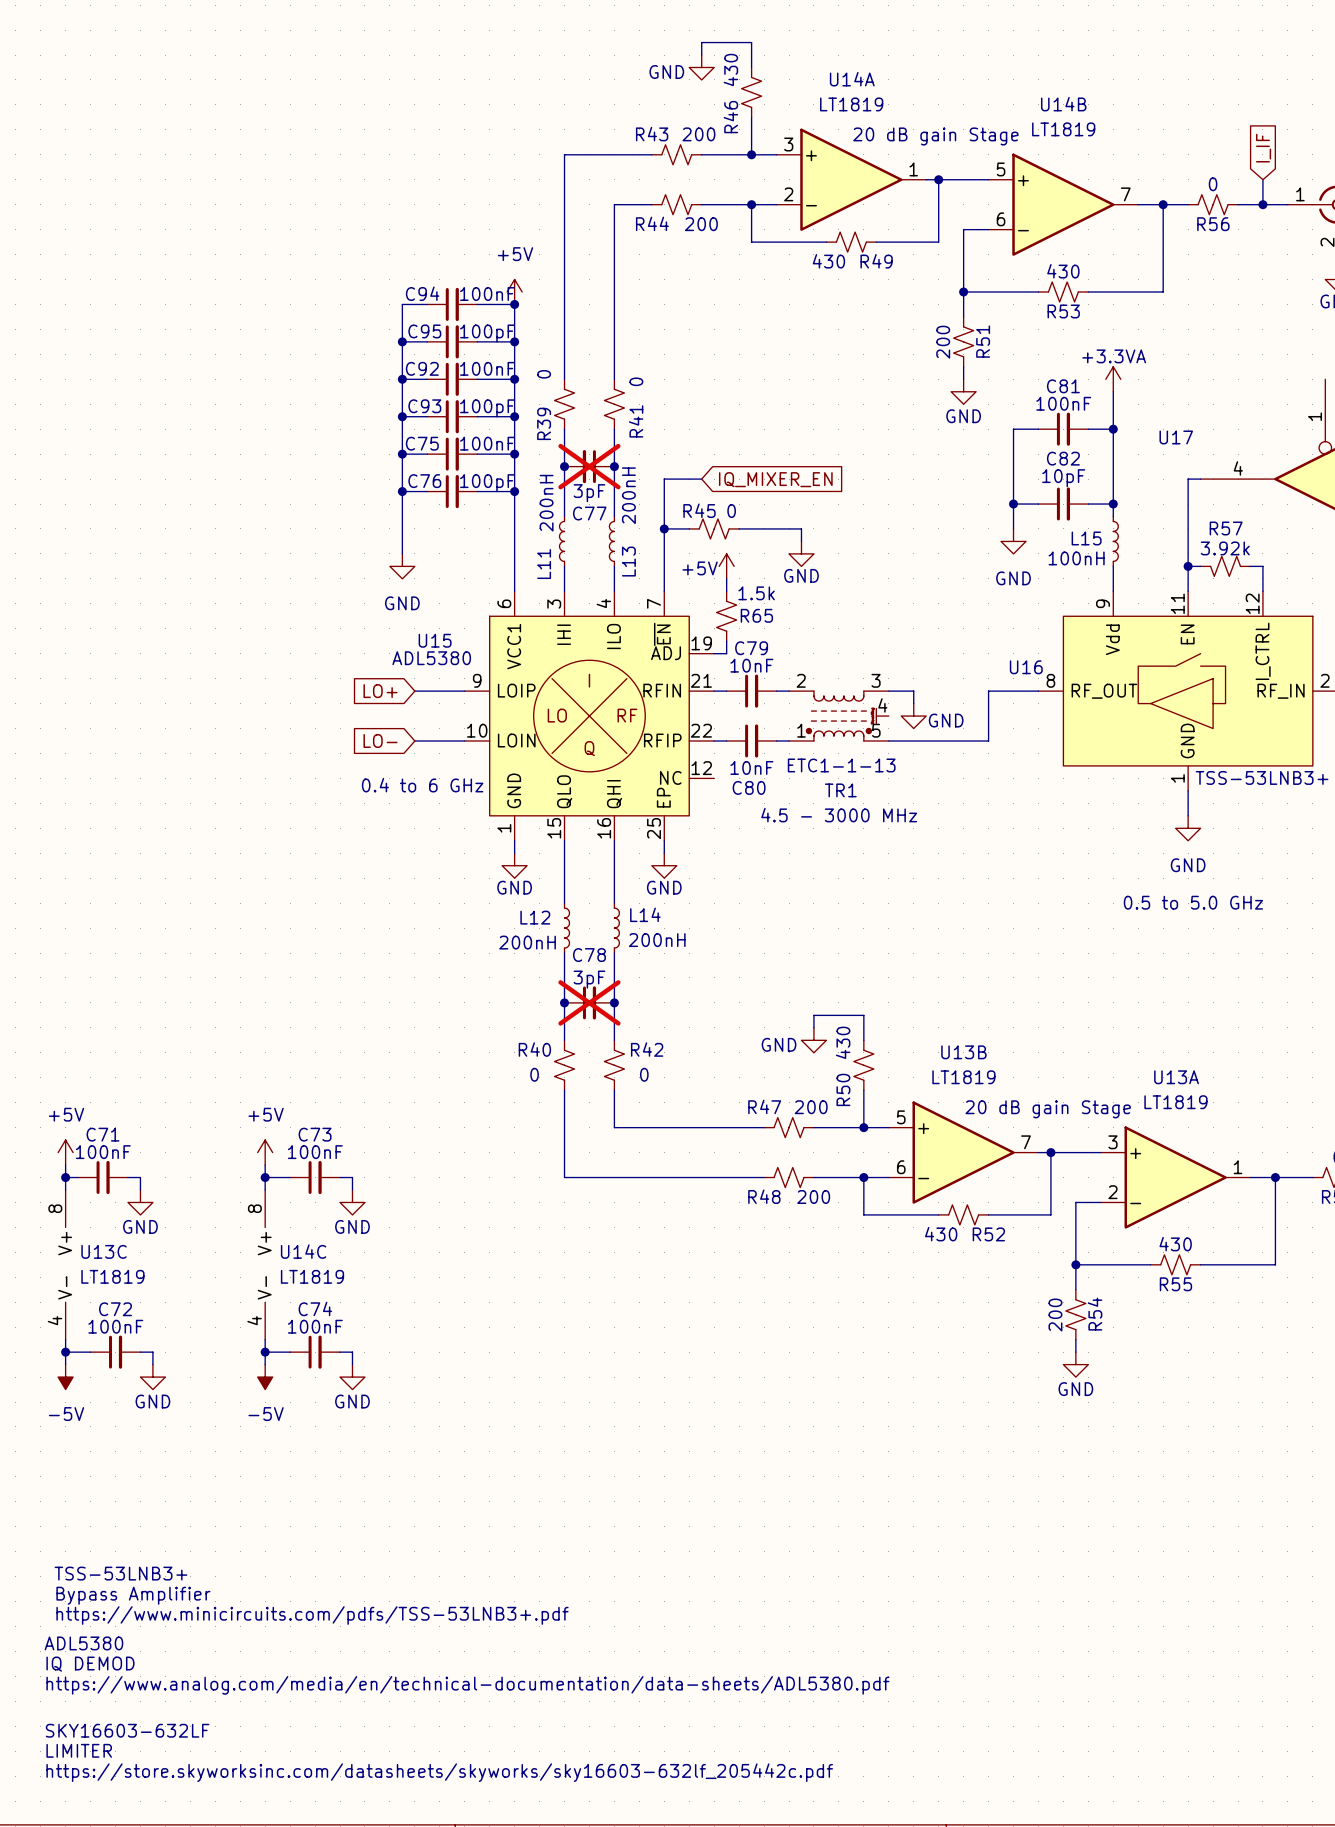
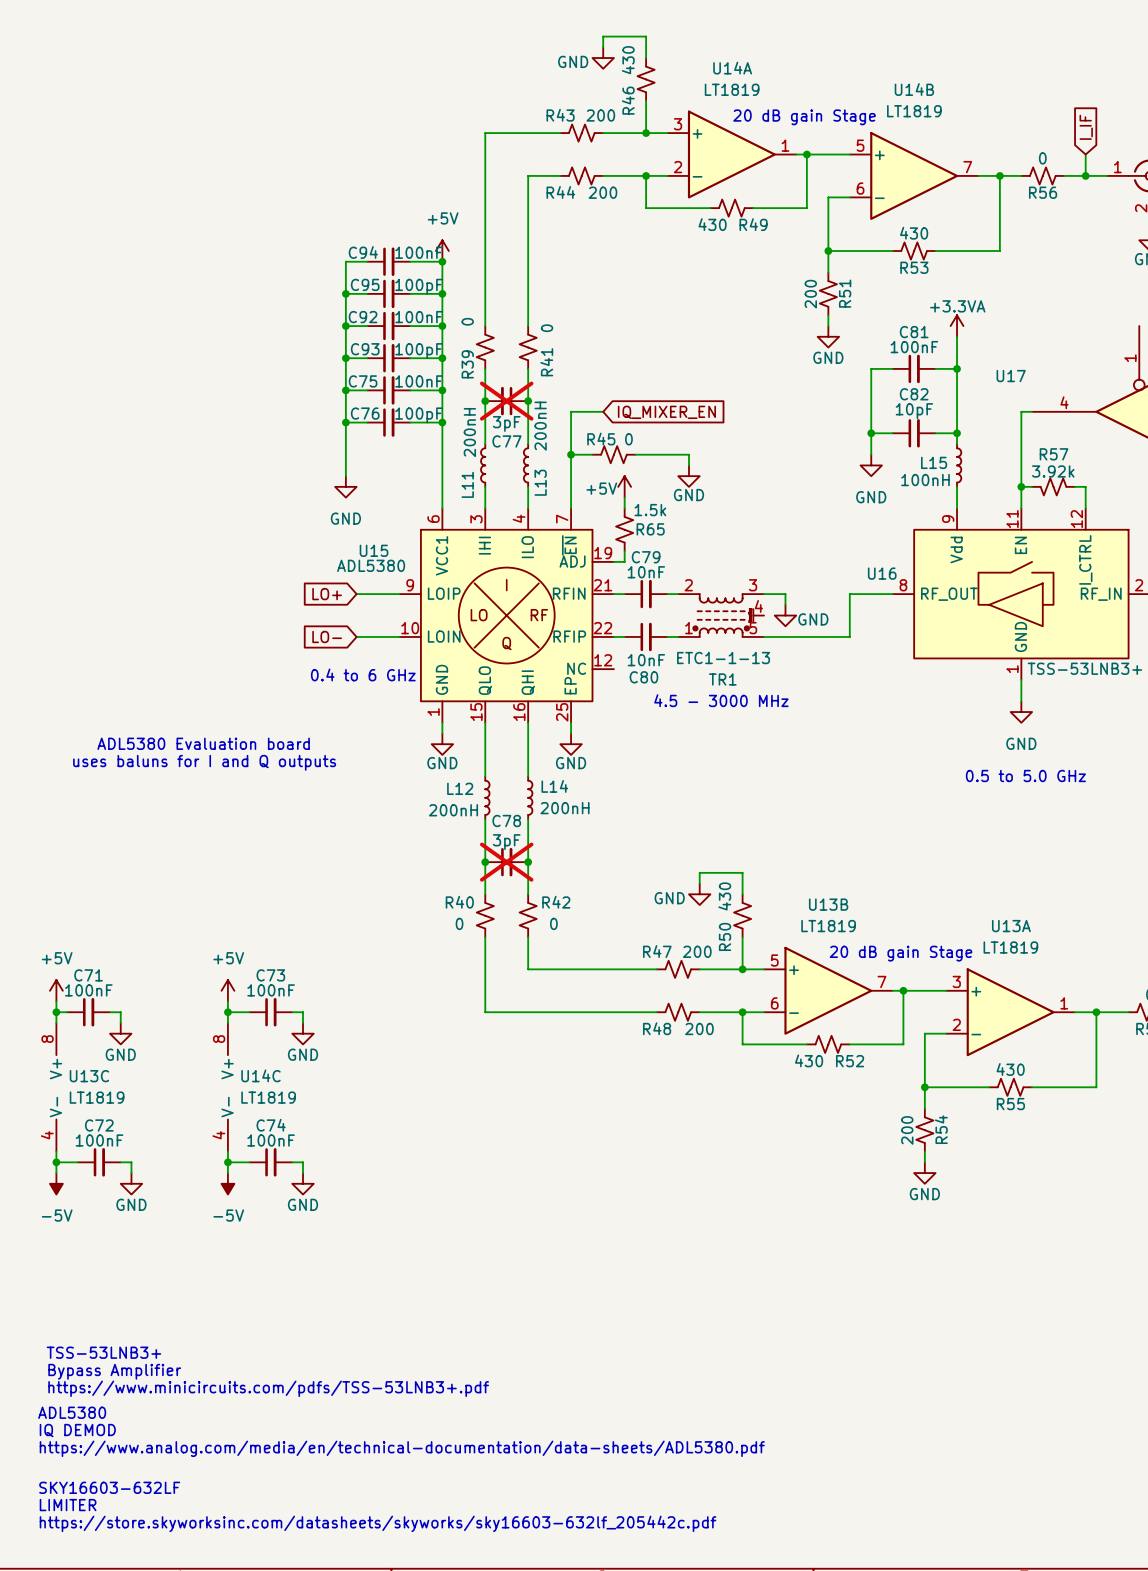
text: none -> ADL5380 Evaluation board (203, 743)
text: none -> uses baluns for I and Q outputs (204, 762)

